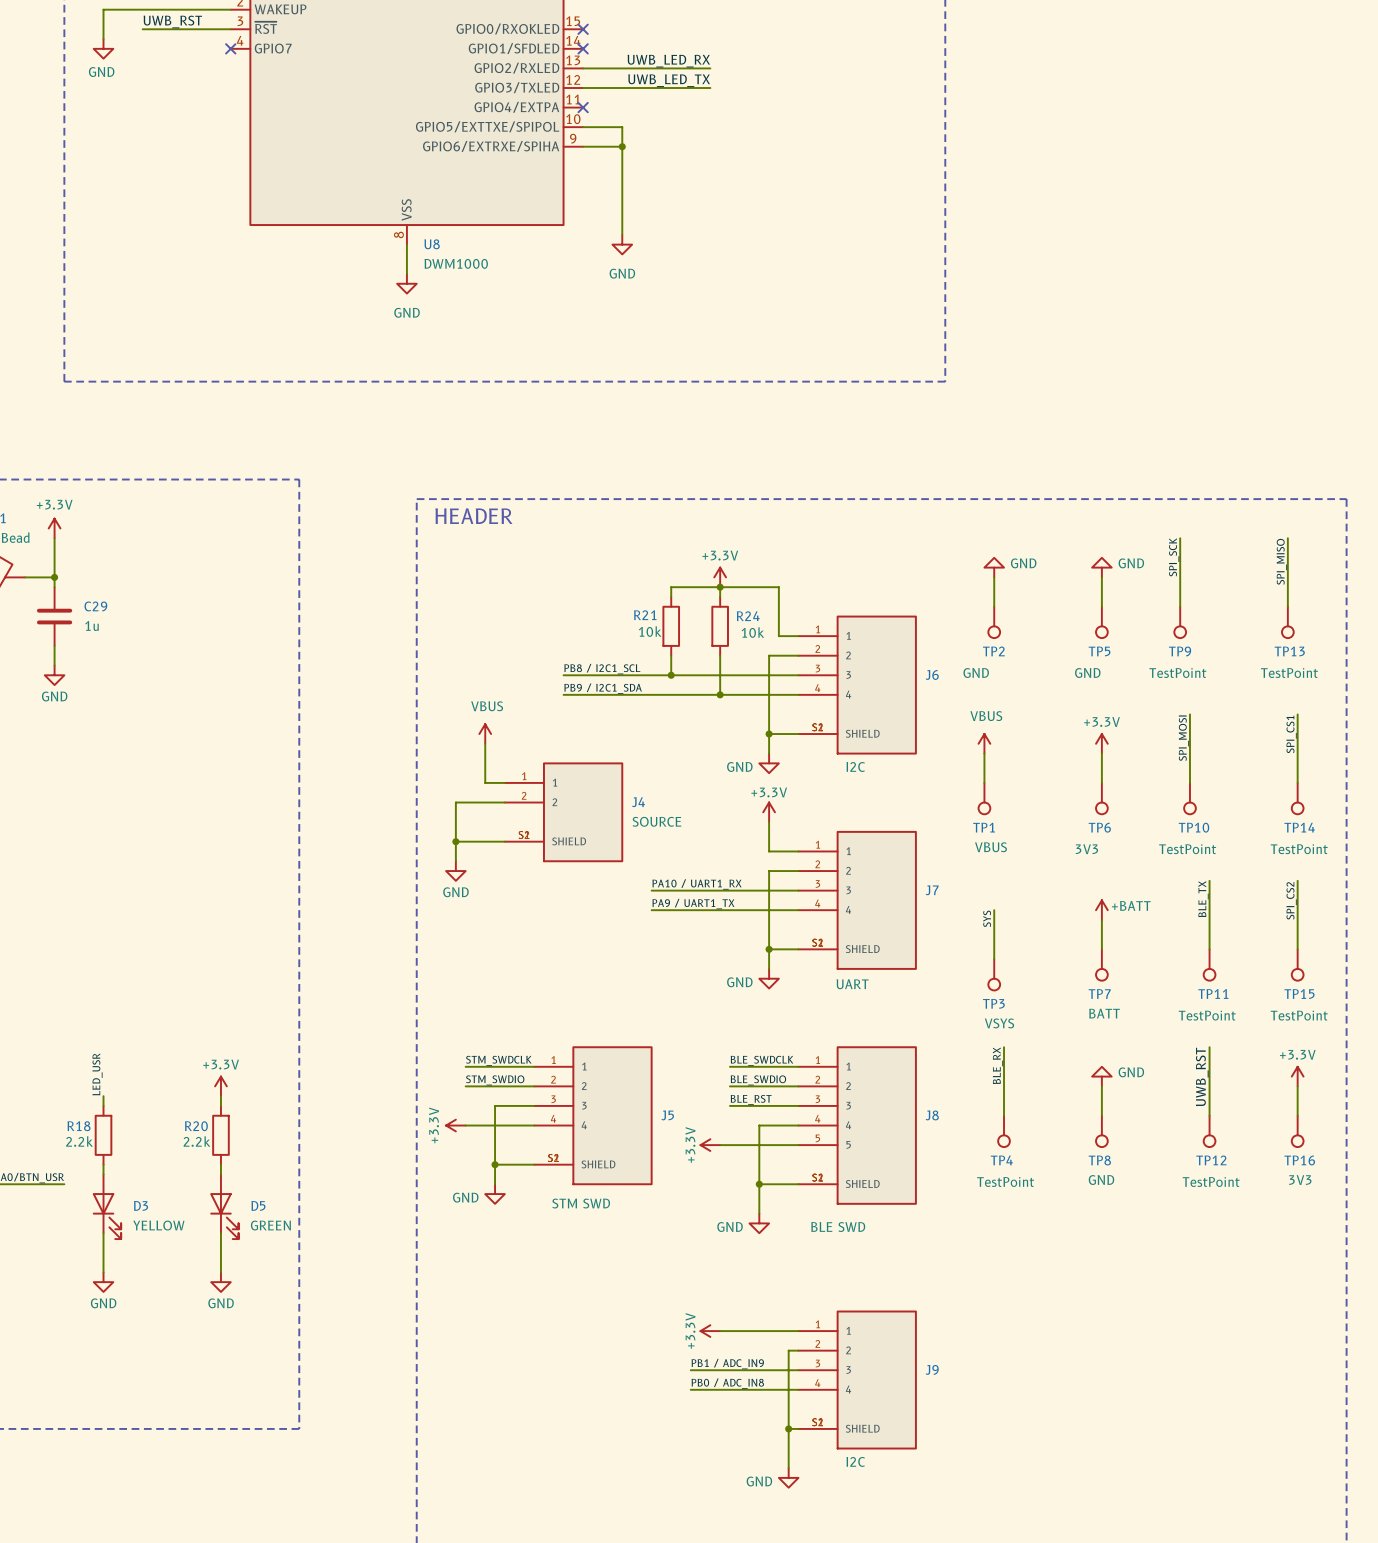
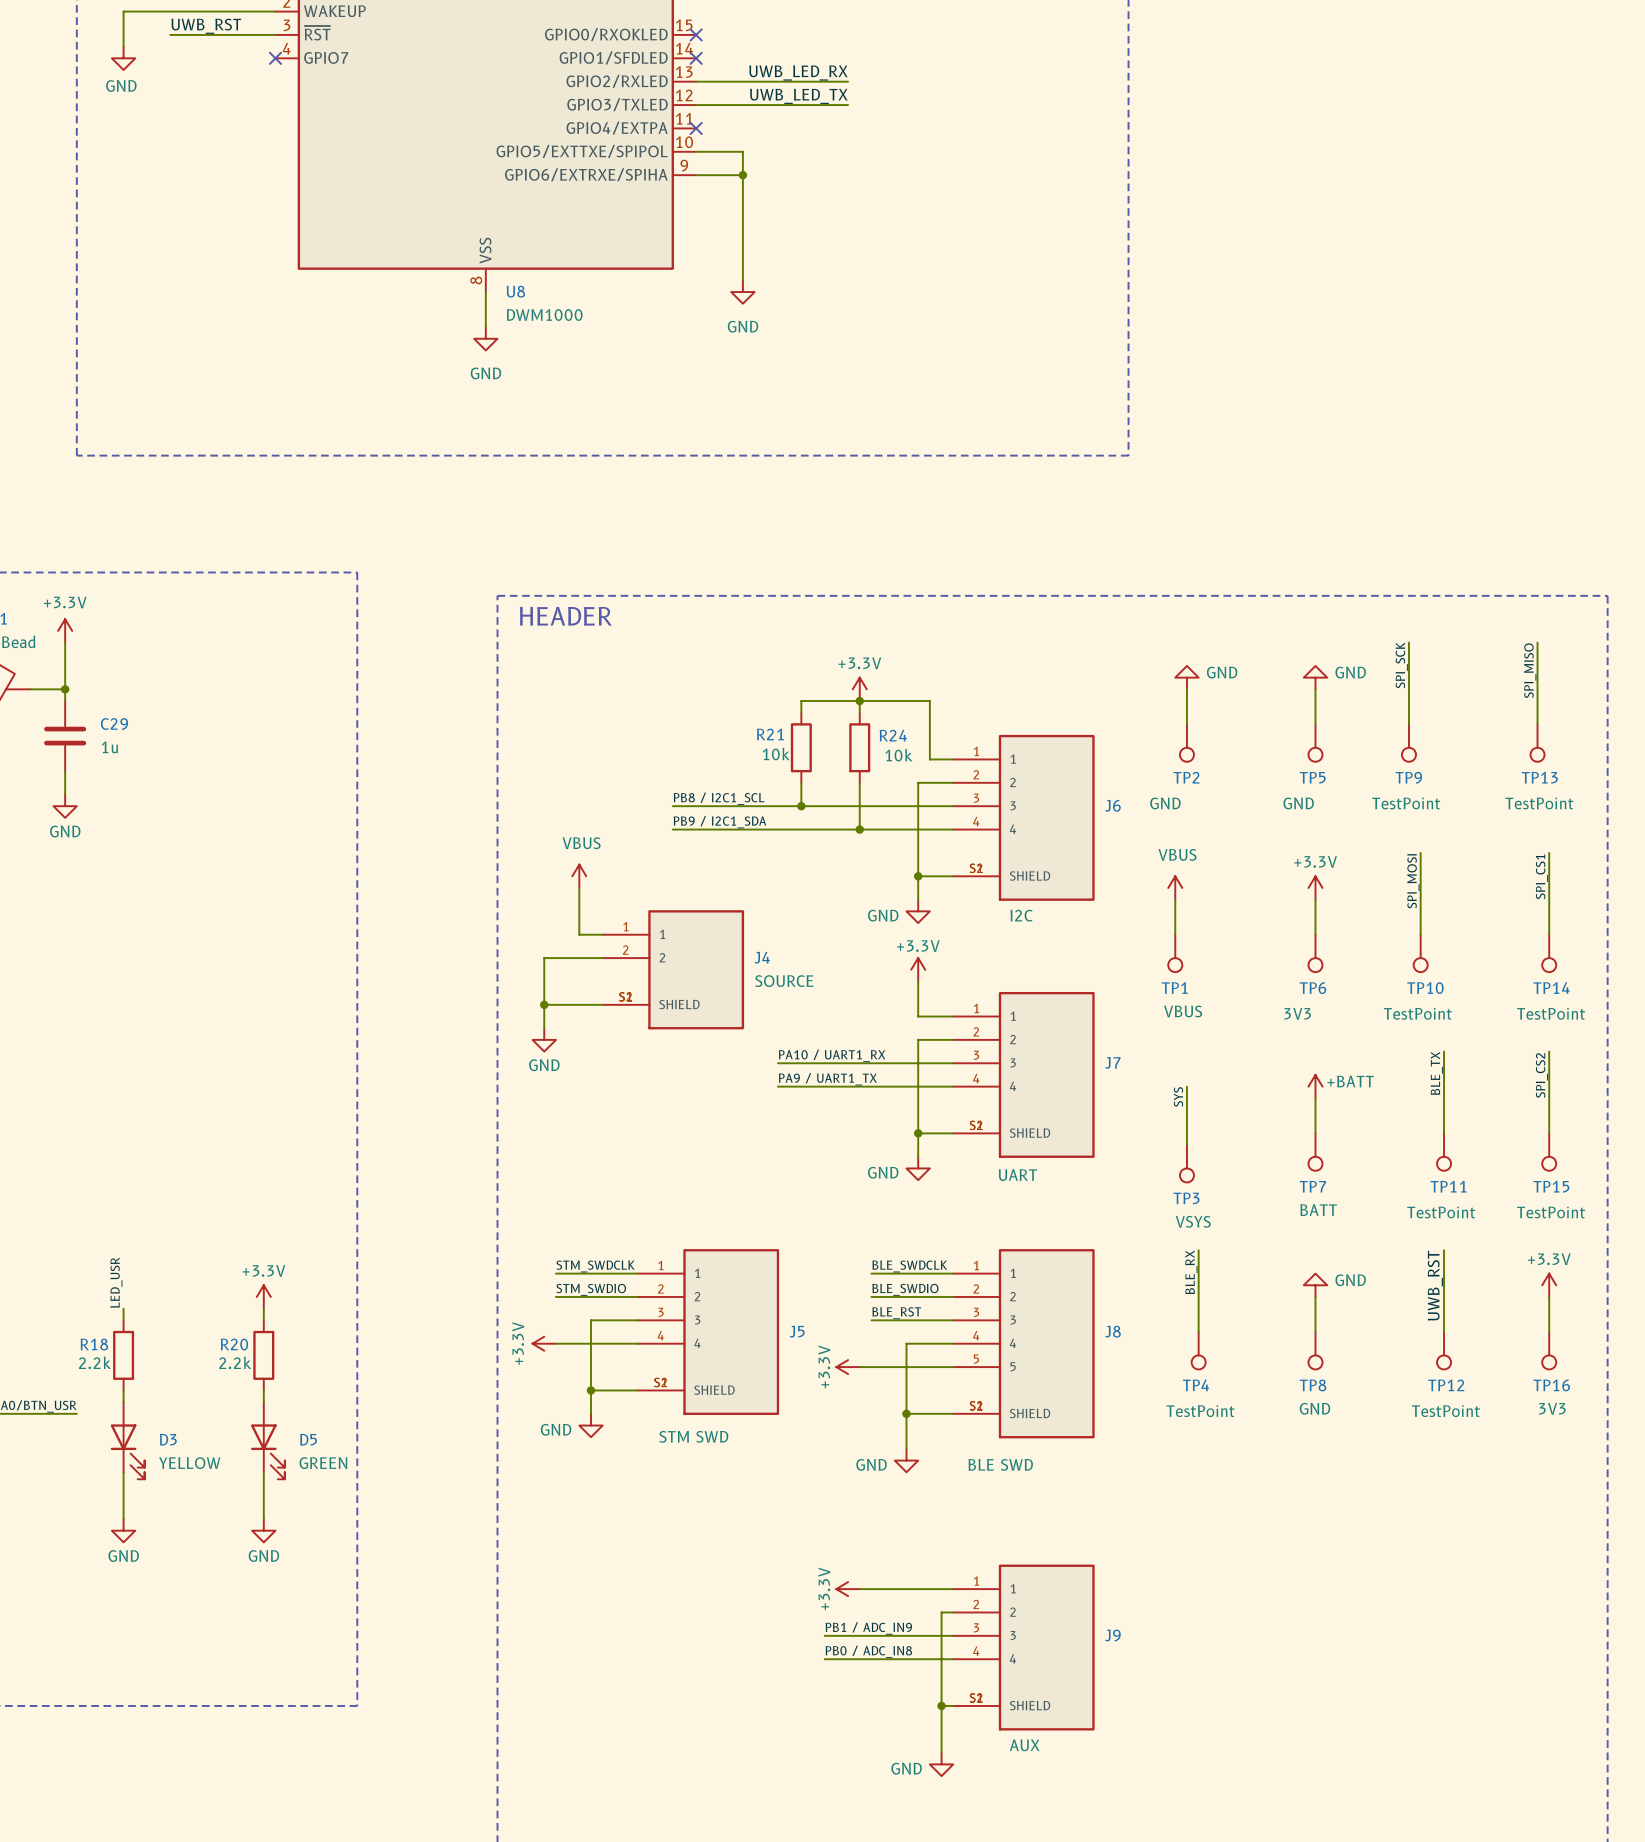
J9 value: I2C (855, 1461) -> AUX (1024, 1745)

